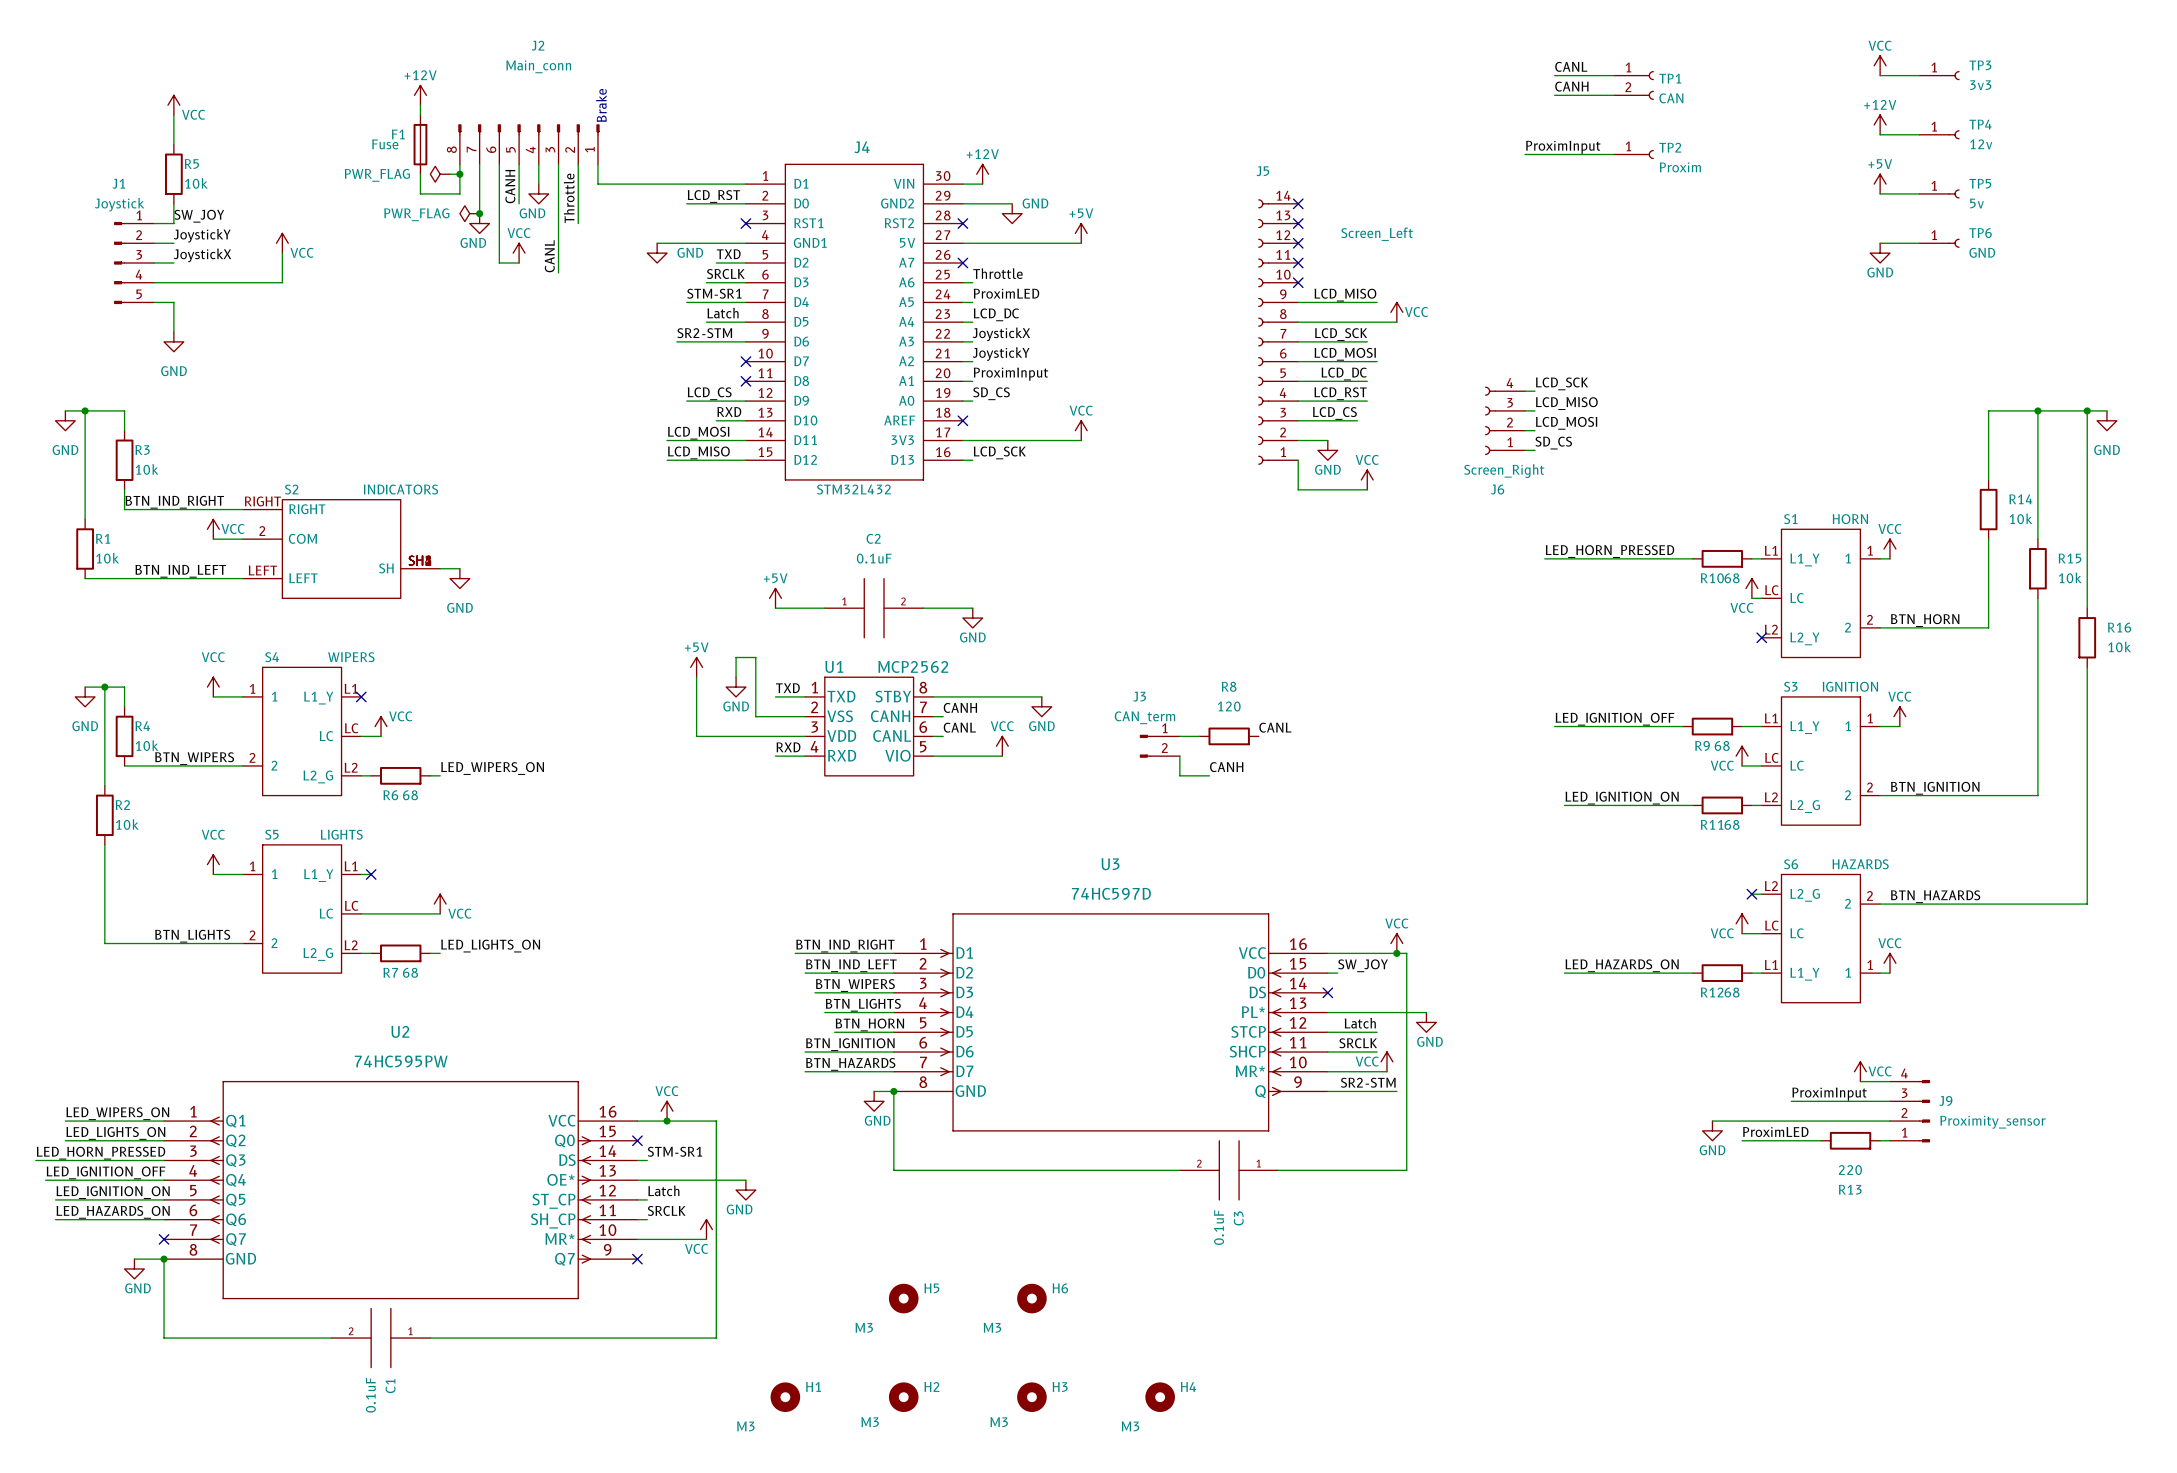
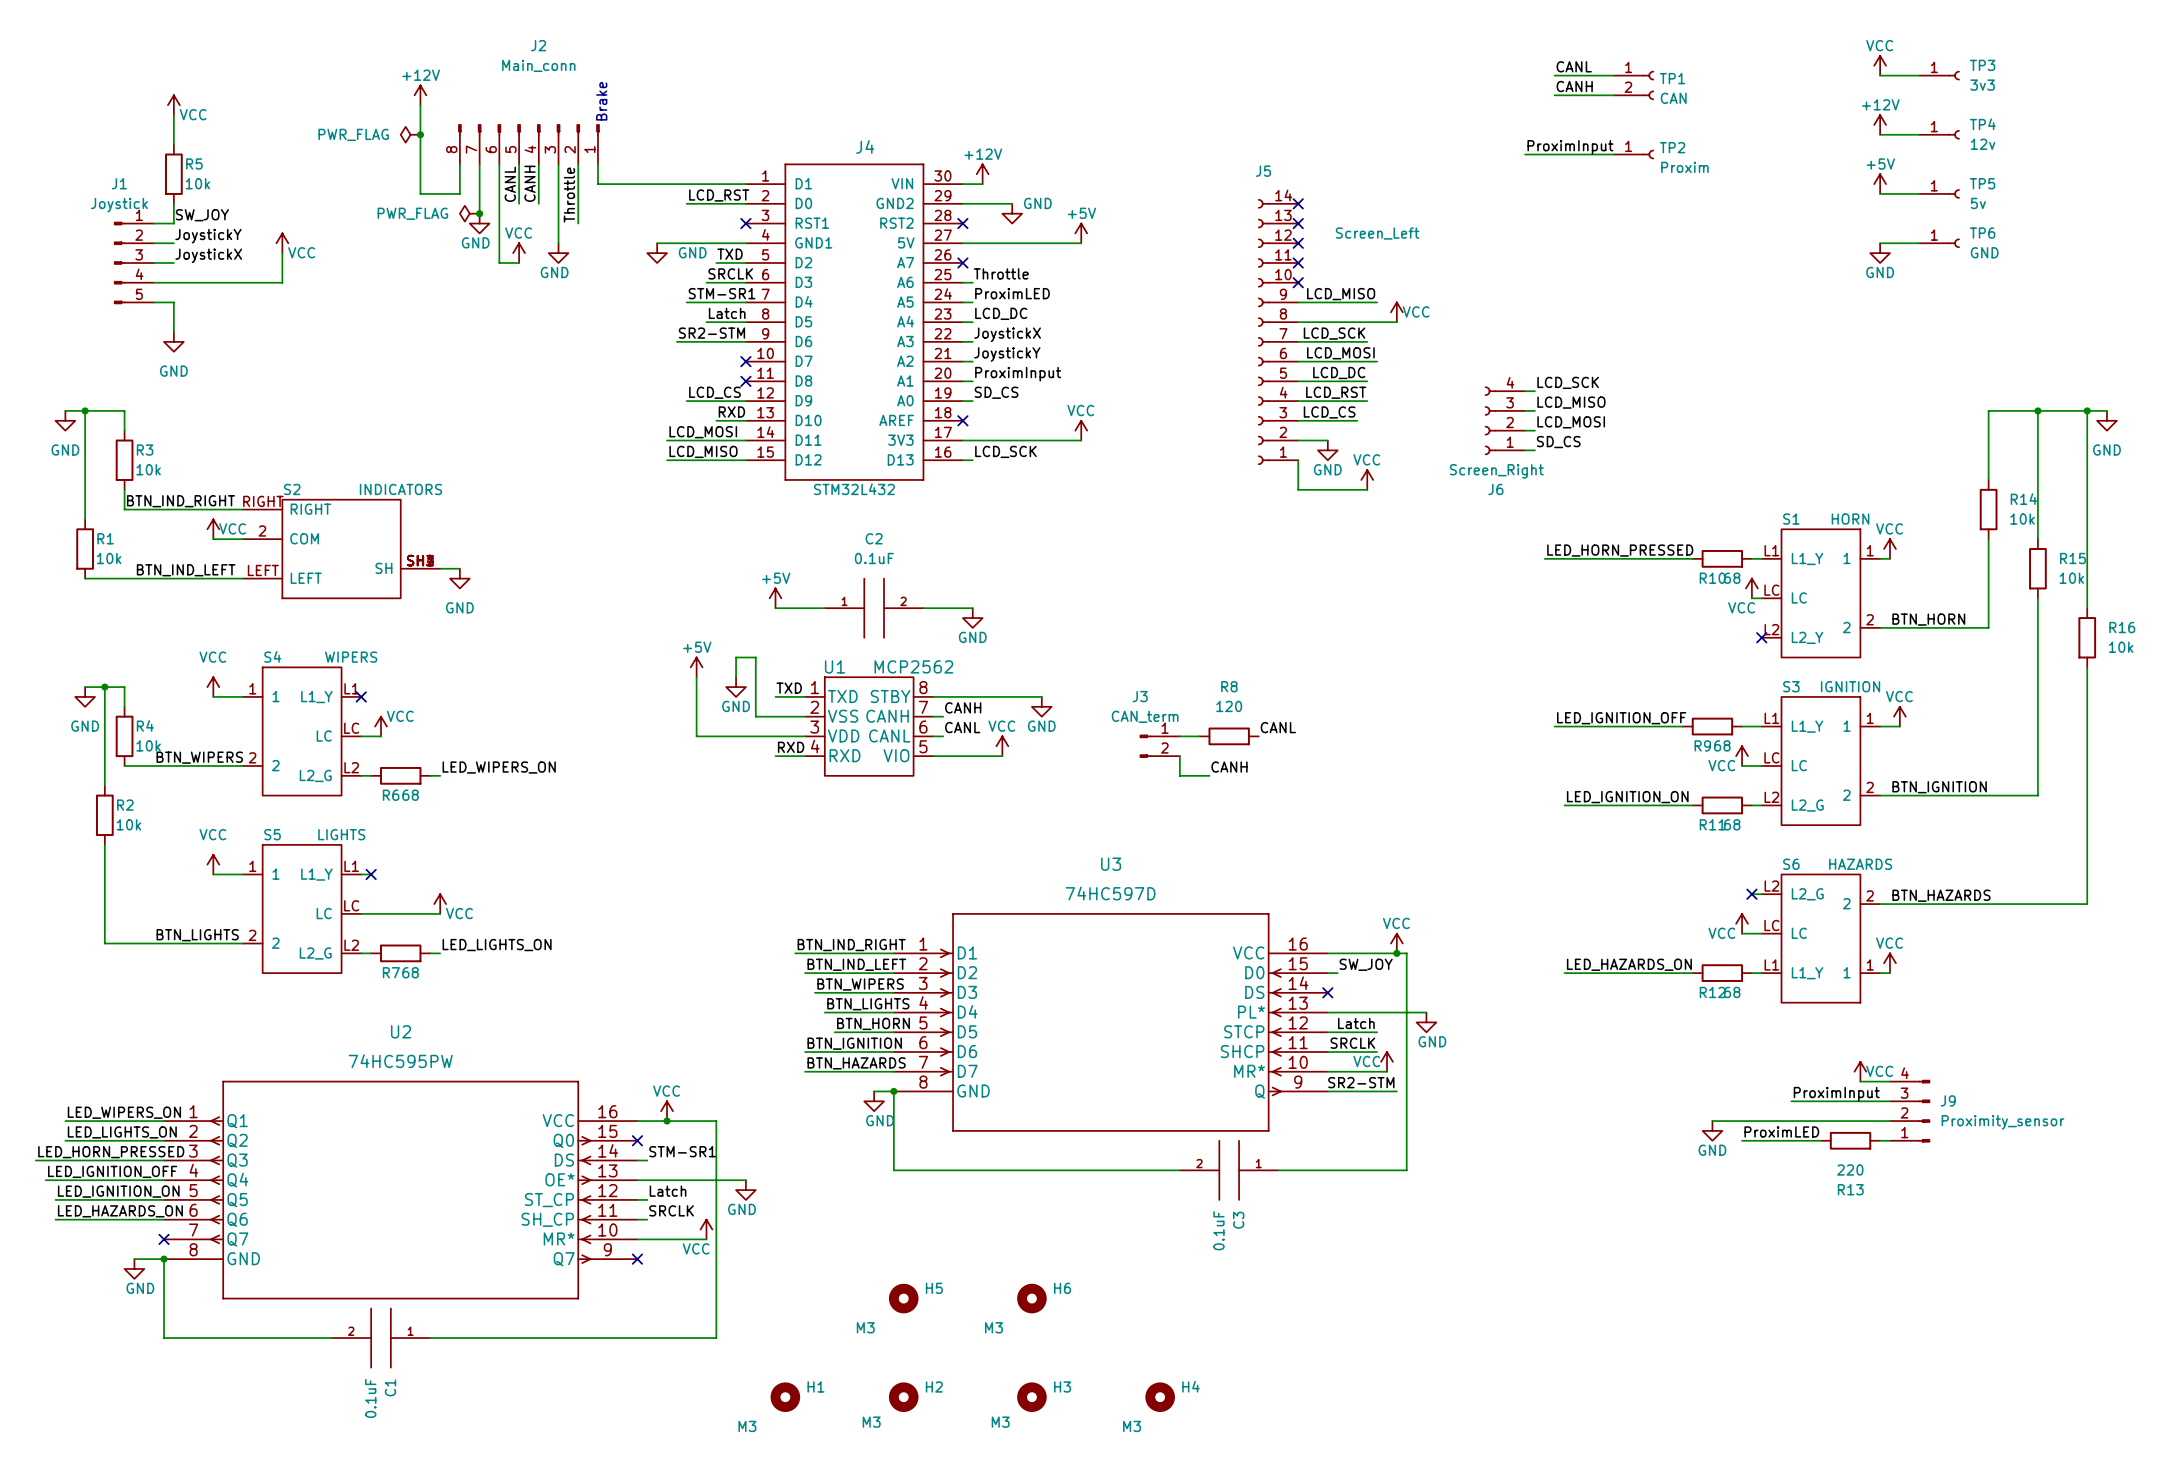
junction: none -> (420, 134)
F1: Fuse (420, 144) -> none
power symbol position: PWR_FLAG (440, 174) -> PWR_FLAG (410, 134)
wire: (450, 174) (459, 174) -> none
junction: (459, 174) -> none
power symbol text position: PWR_FLAG (377, 175) -> PWR_FLAG (353, 134)
label: CANH (510, 186) -> CANL (510, 184)
label: none -> CANH (530, 183)
power symbol position: GND (538, 193) -> GND (558, 253)
wire: (558, 243) (558, 272) -> none
label: CANL (549, 256) -> none

